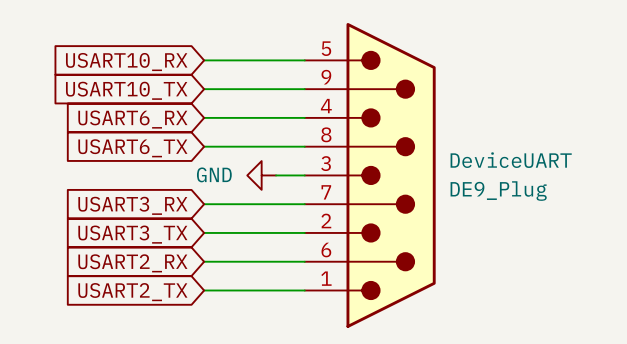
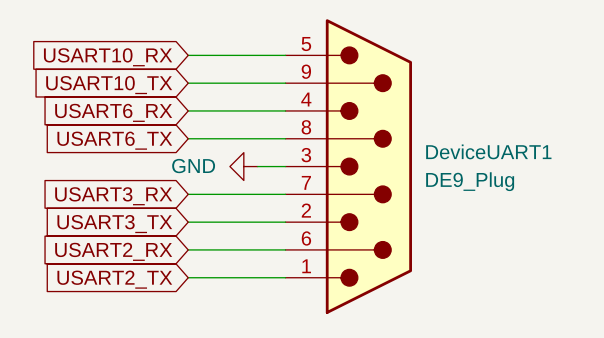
DeviceUART name: DeviceUART (511, 160) -> DeviceUART1 (488, 151)

